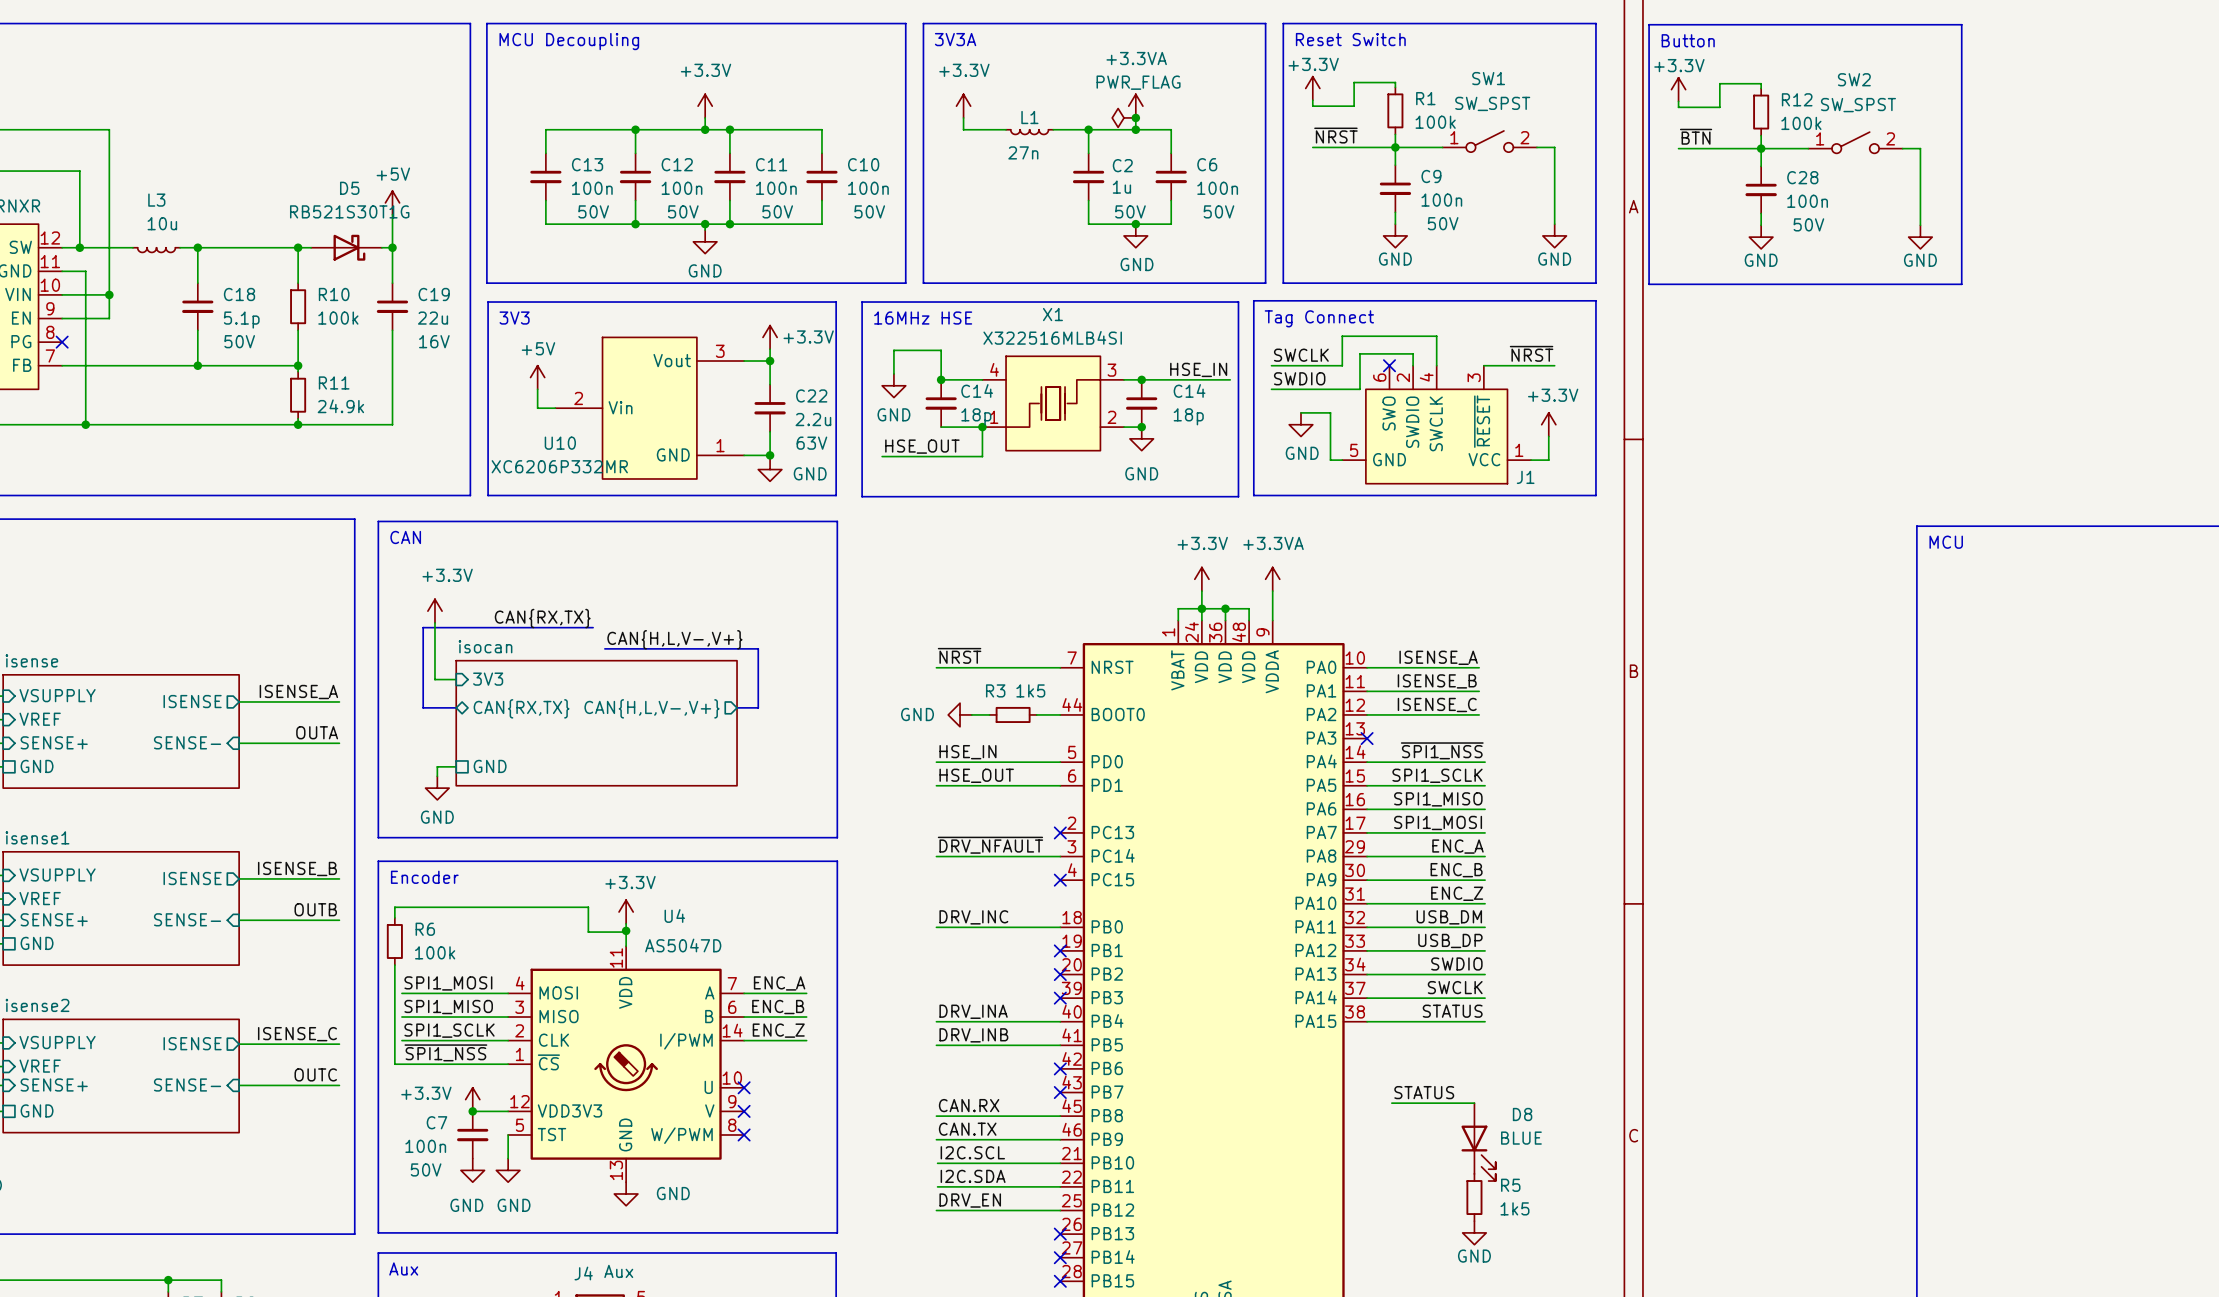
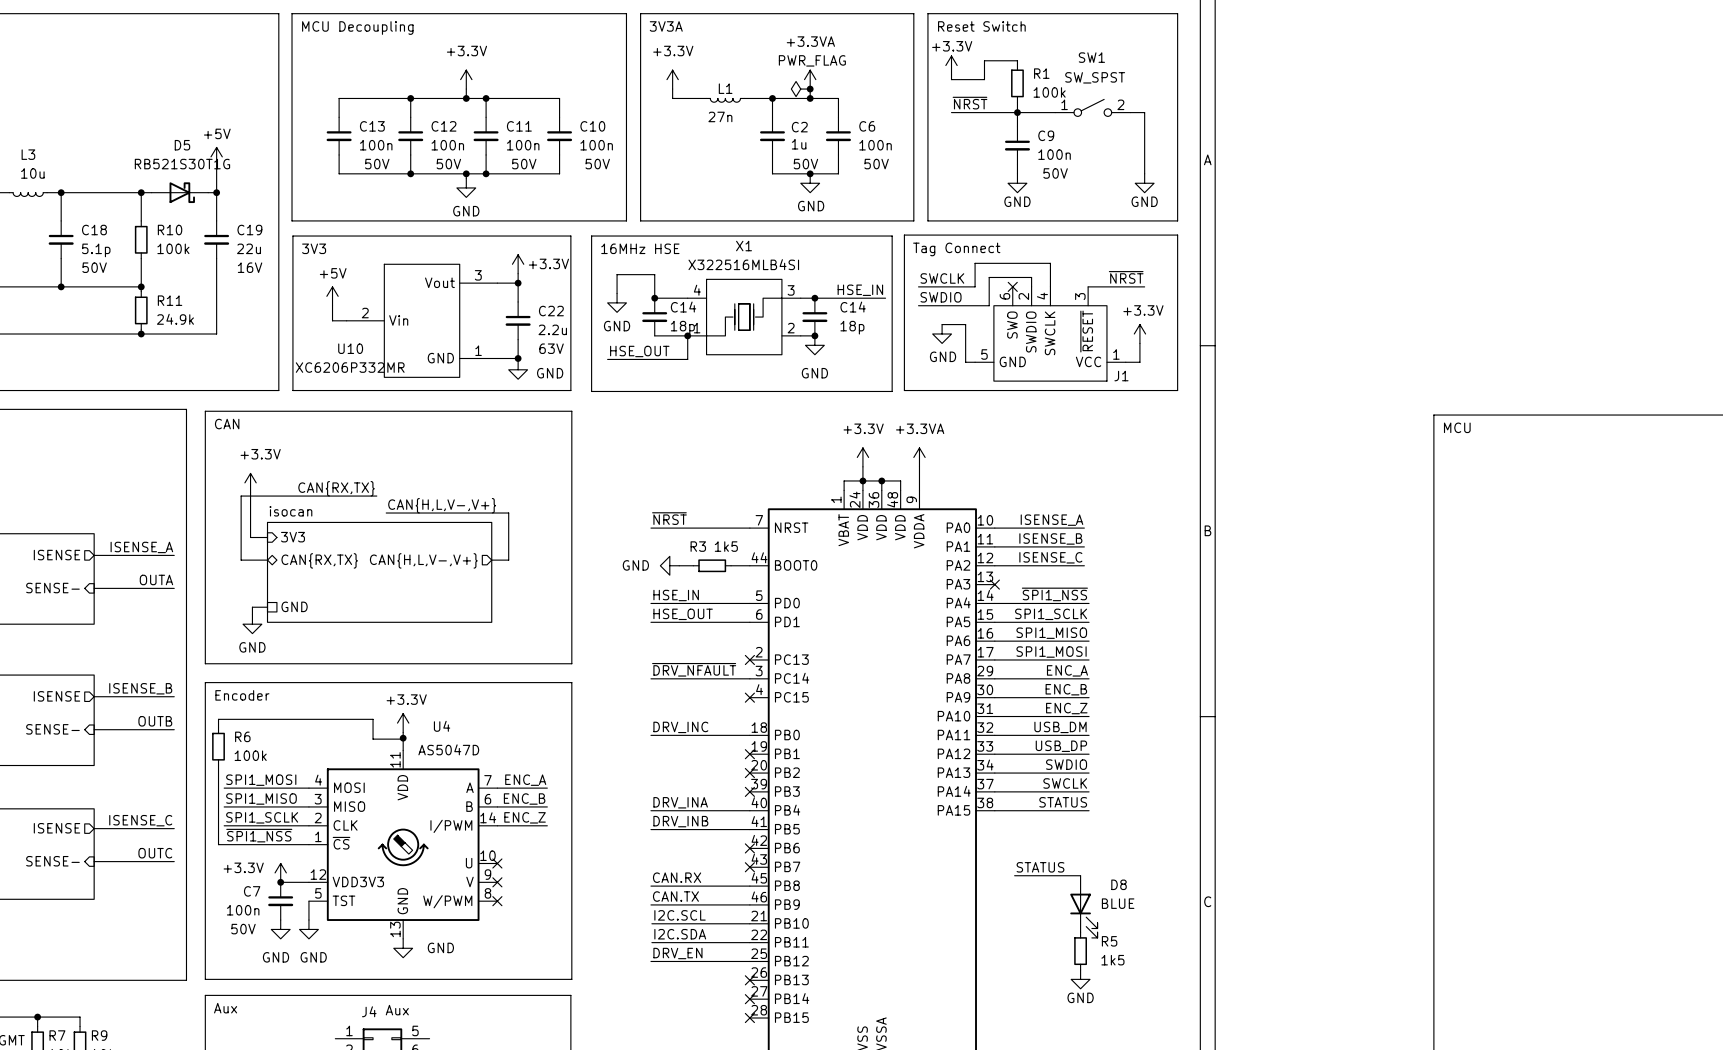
line: (1649, 24) (1961, 24) (1961, 284) (1649, 284) (1649, 24) -> none
text: Button (1688, 40) -> none
wire: (1761, 88) (1761, 83) (1719, 83) (1719, 107) (1678, 107) (1678, 101) -> none
power symbol: +3.3V (1678, 89) -> none
R12: 100k (1761, 112) -> none
wire: (1761, 135) (1761, 166) -> none
label: ~{BTN} (1696, 136) -> none
SW2: SW_SPST (1855, 142) -> none
wire: (1678, 148) (1808, 148) -> none
junction: (1761, 148) -> none
wire: (1902, 148) (1920, 148) (1920, 225) -> none
C28: 100n (1761, 189) -> none
wire: (1761, 213) (1761, 225) -> none
power symbol: GND (1761, 237) -> none
power symbol: GND (1920, 237) -> none

